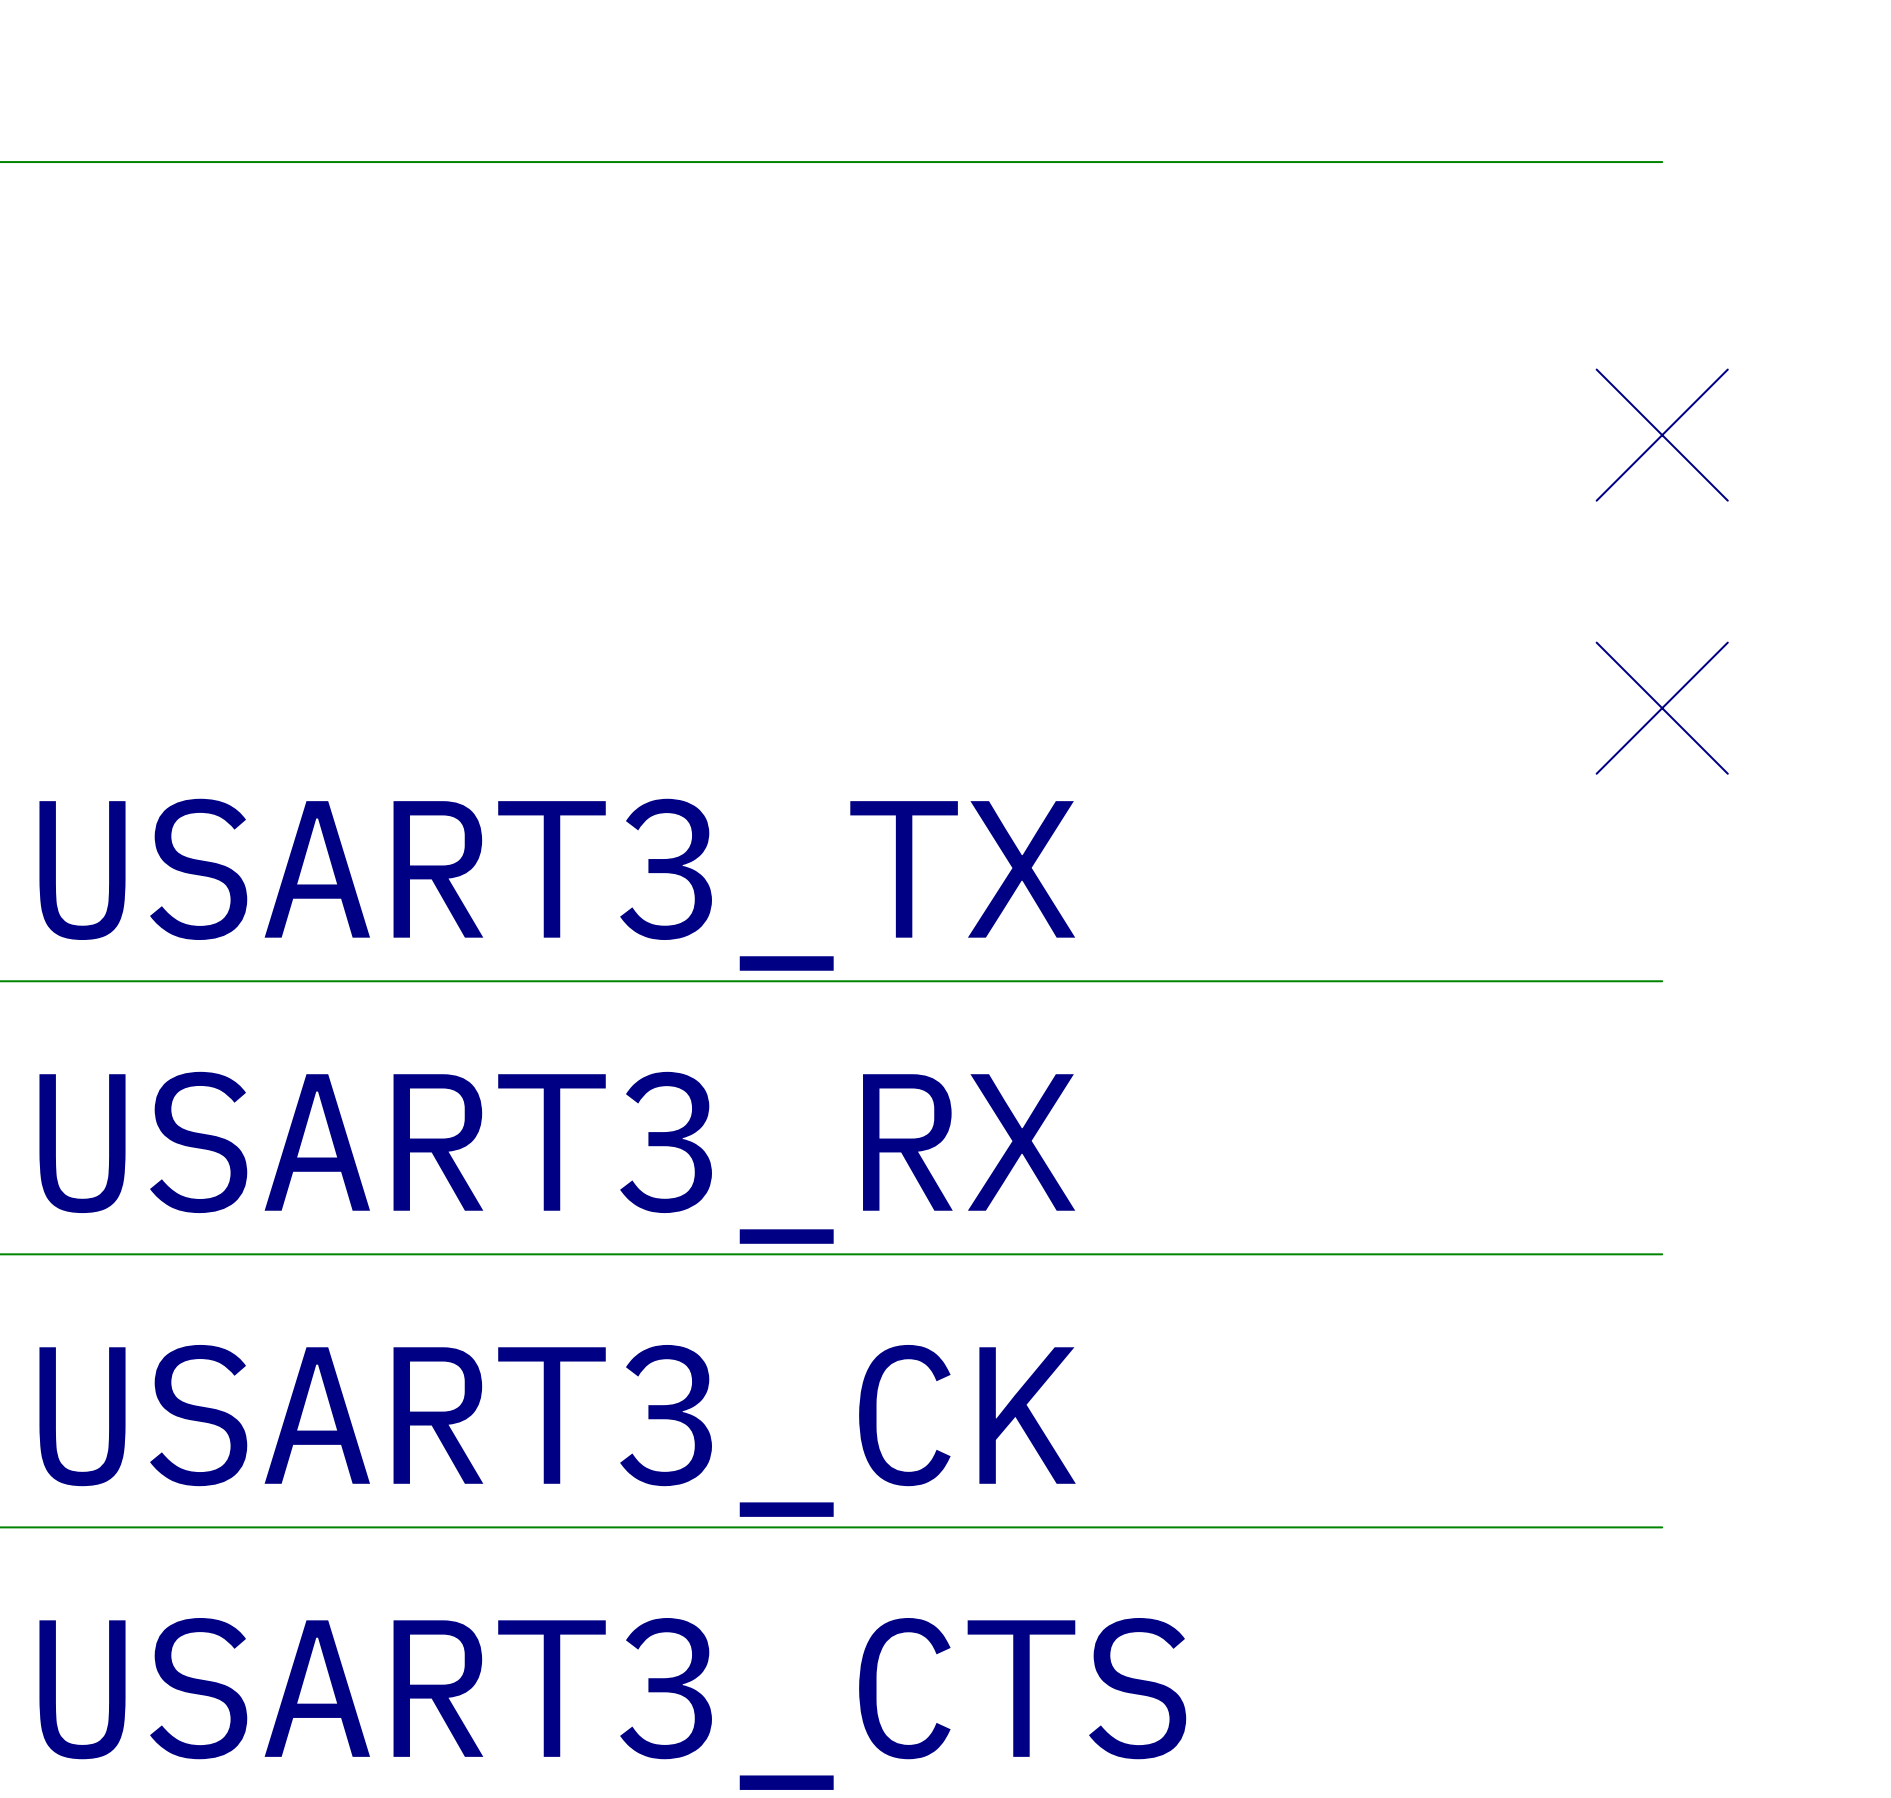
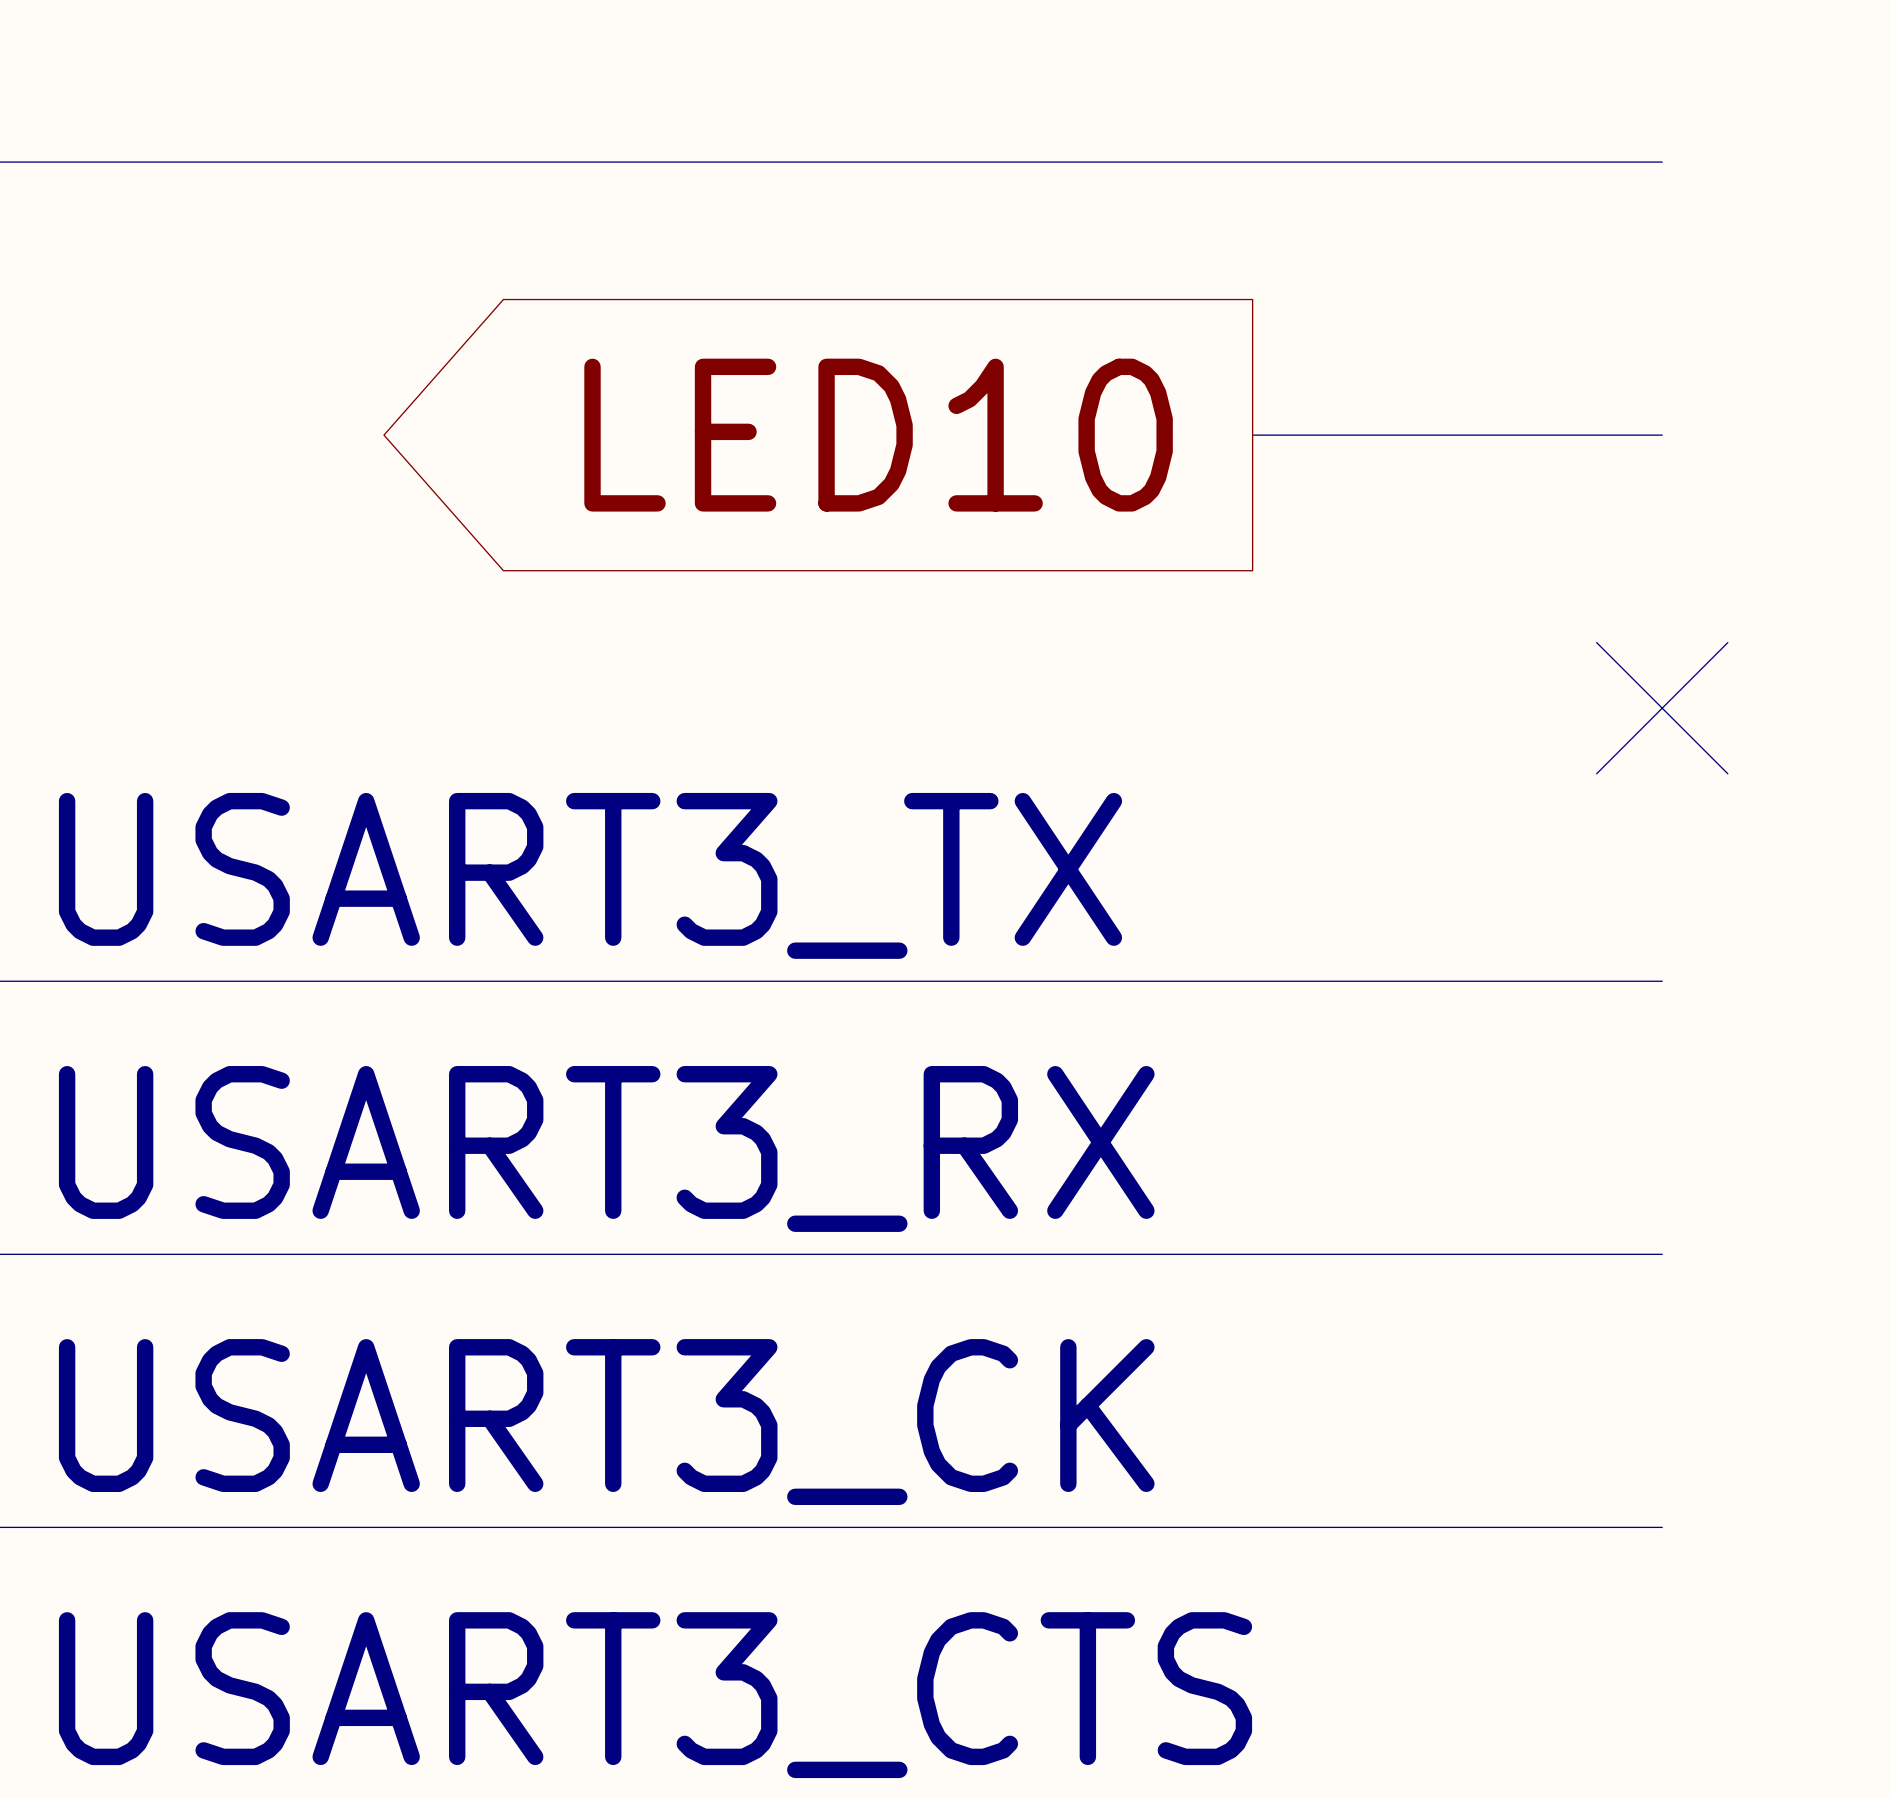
global label: none -> LED10 (878, 435)
wire: none -> (1252, 435) (1662, 435)
no-connect mark: (1662, 435) -> none

